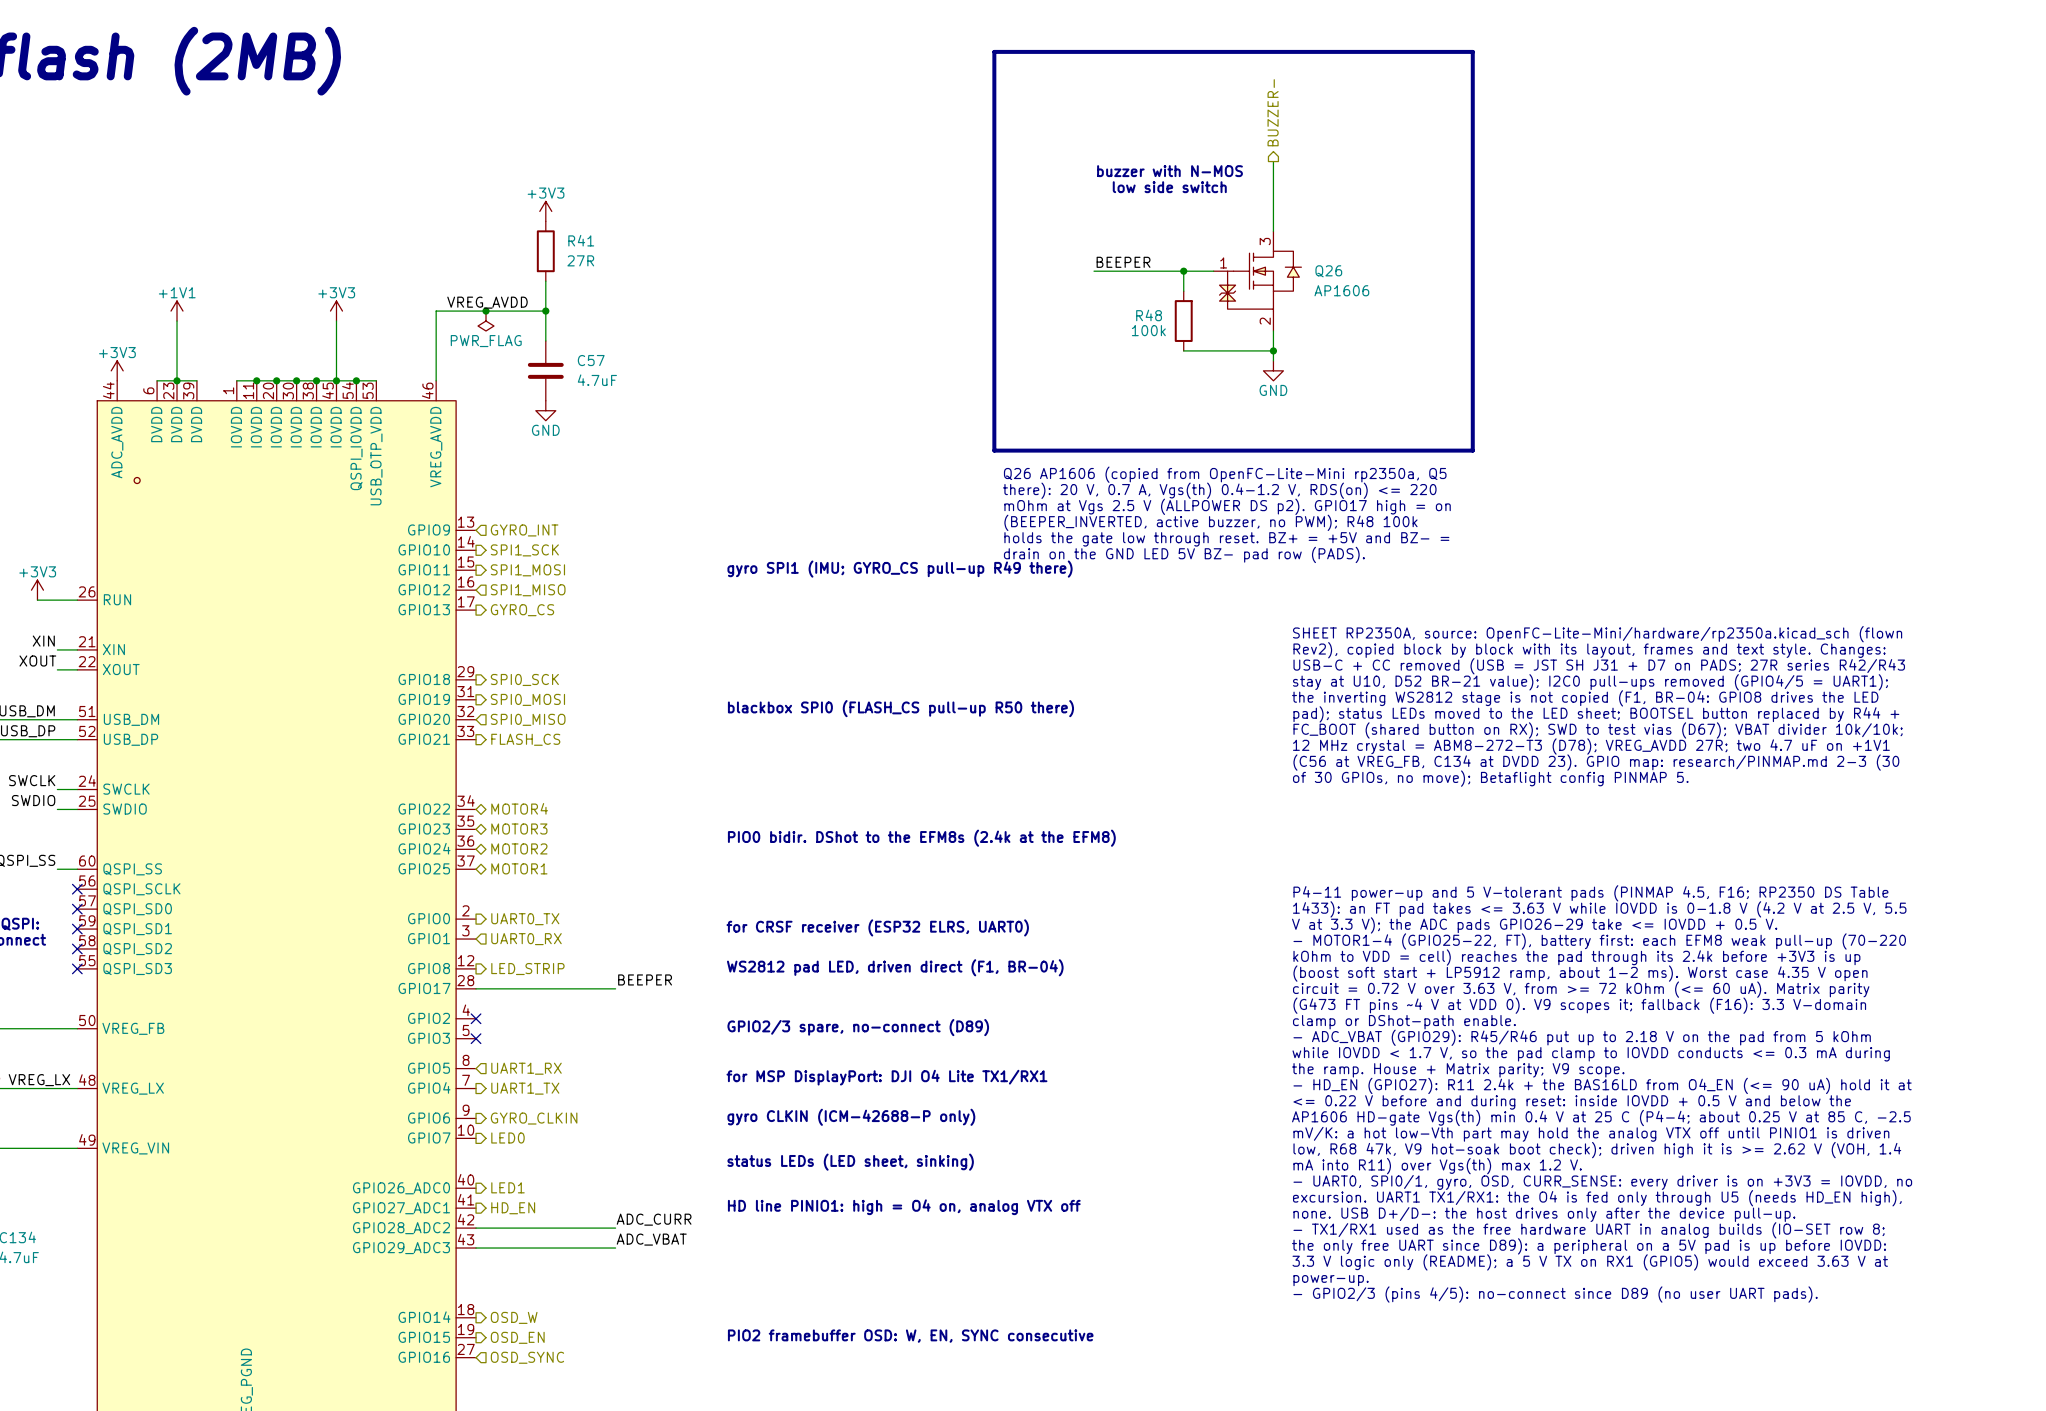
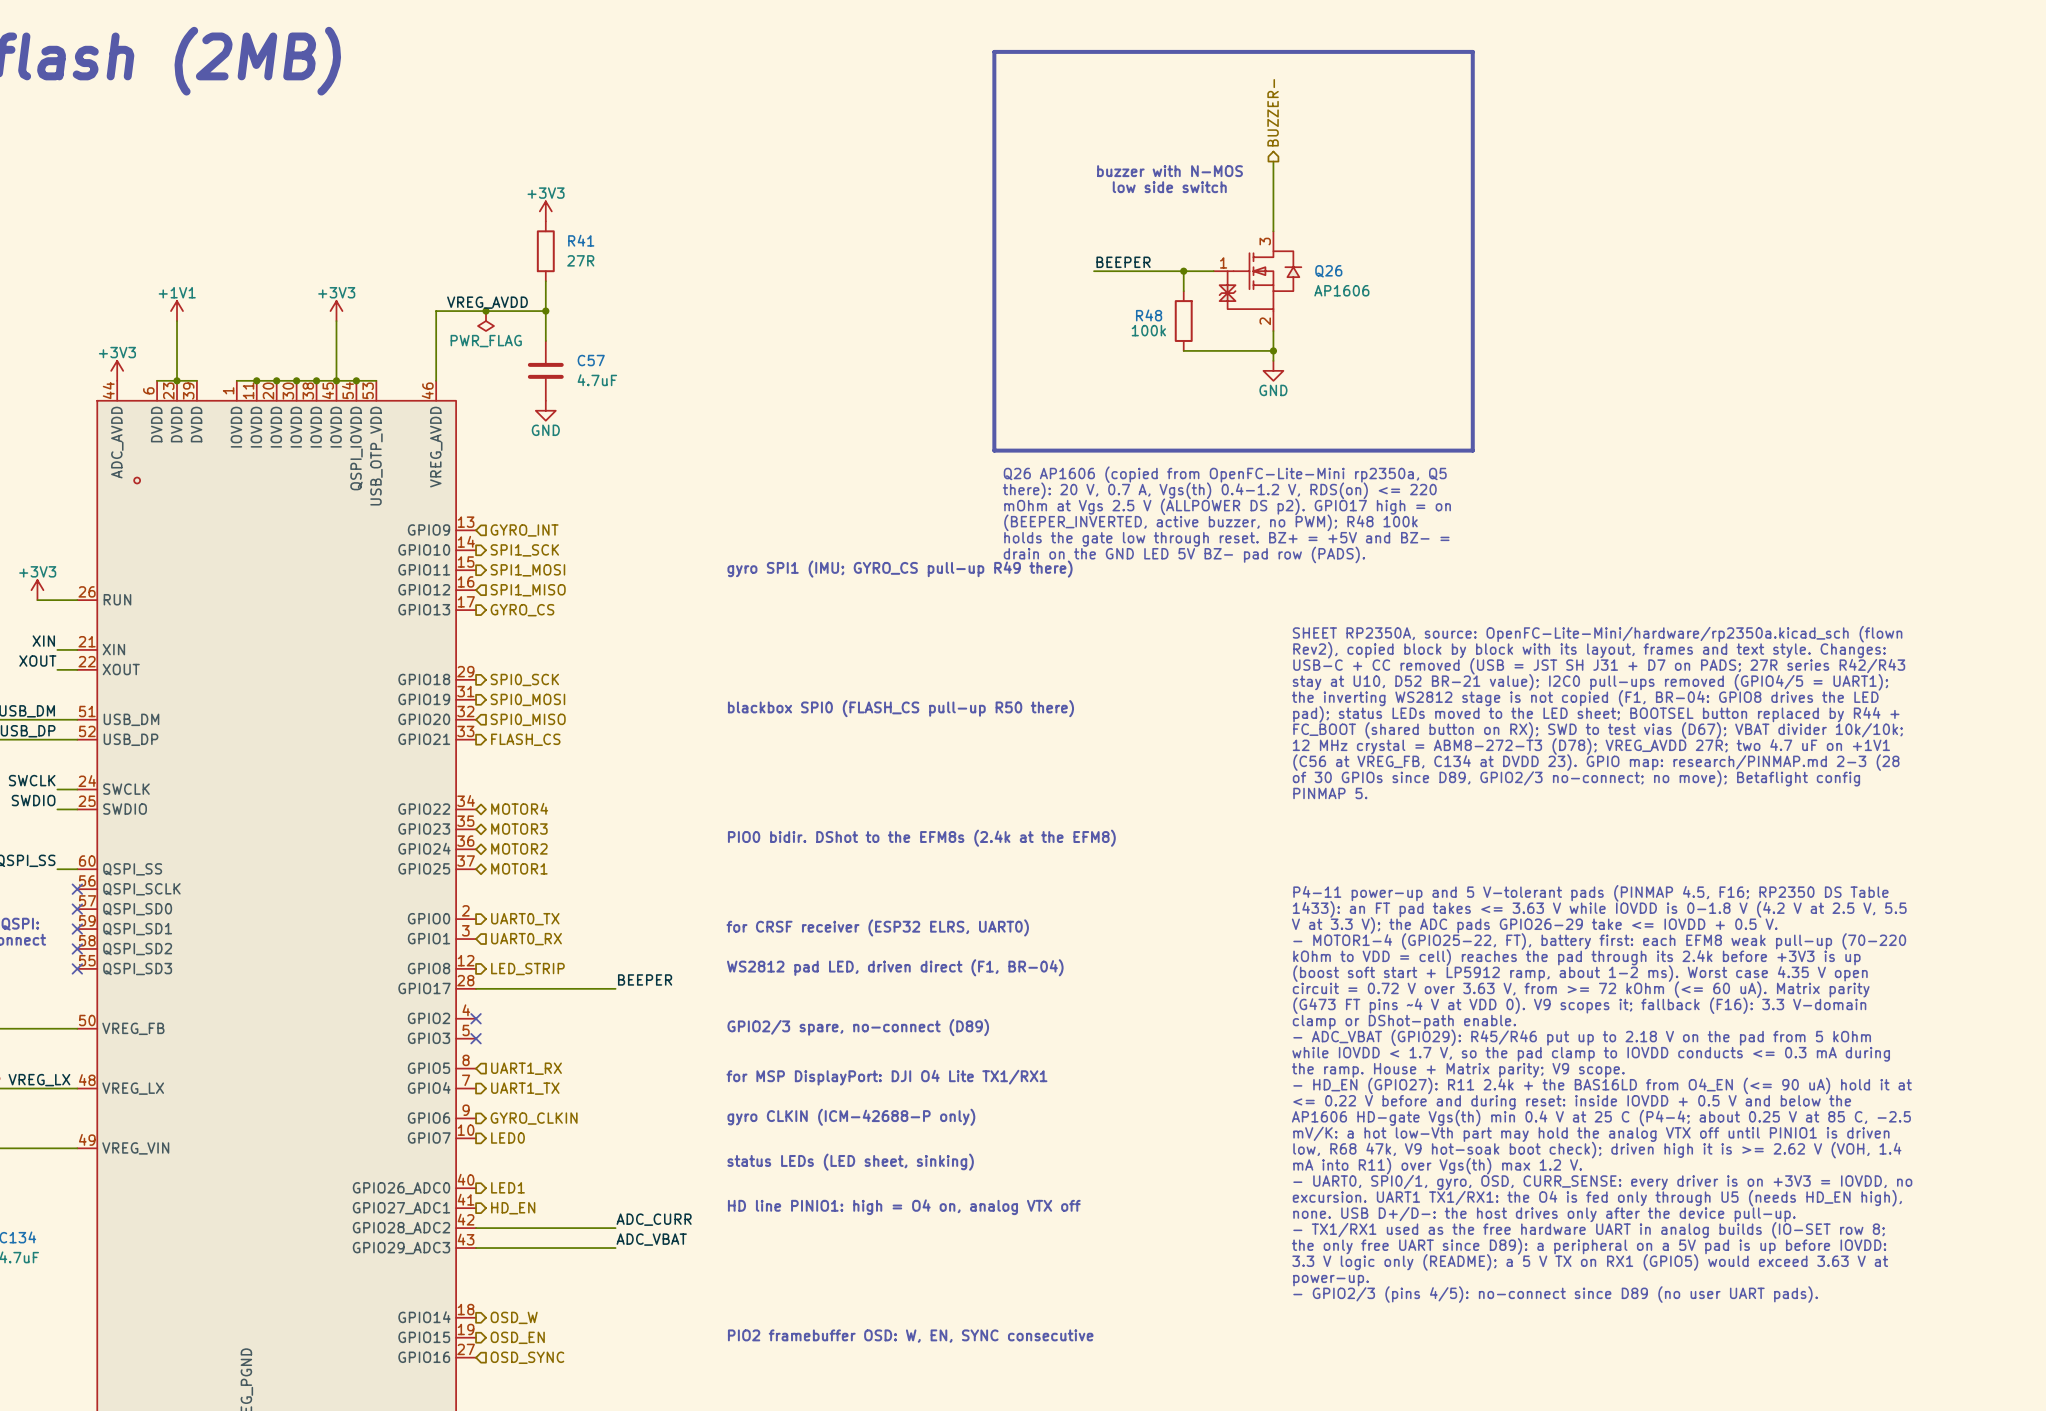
text: (C56 at VREG_FB, C134 at DVDD 23). GPIO map: research/PINMAP.md 2-3 (30 (1596, 762) -> (C56 at VREG_FB, C134 at DVDD 23). GPIO map: research/PINMAP.md 2-3 (28 (1596, 762)
text: of 30 GPIOs, no move); Betaflight config PINMAP 5. (1490, 778) -> of 30 GPIOs since D89, GPIO2/3 no-connect; no move); Betaflight config (1576, 778)
text: none -> PINMAP 5. (1330, 793)

